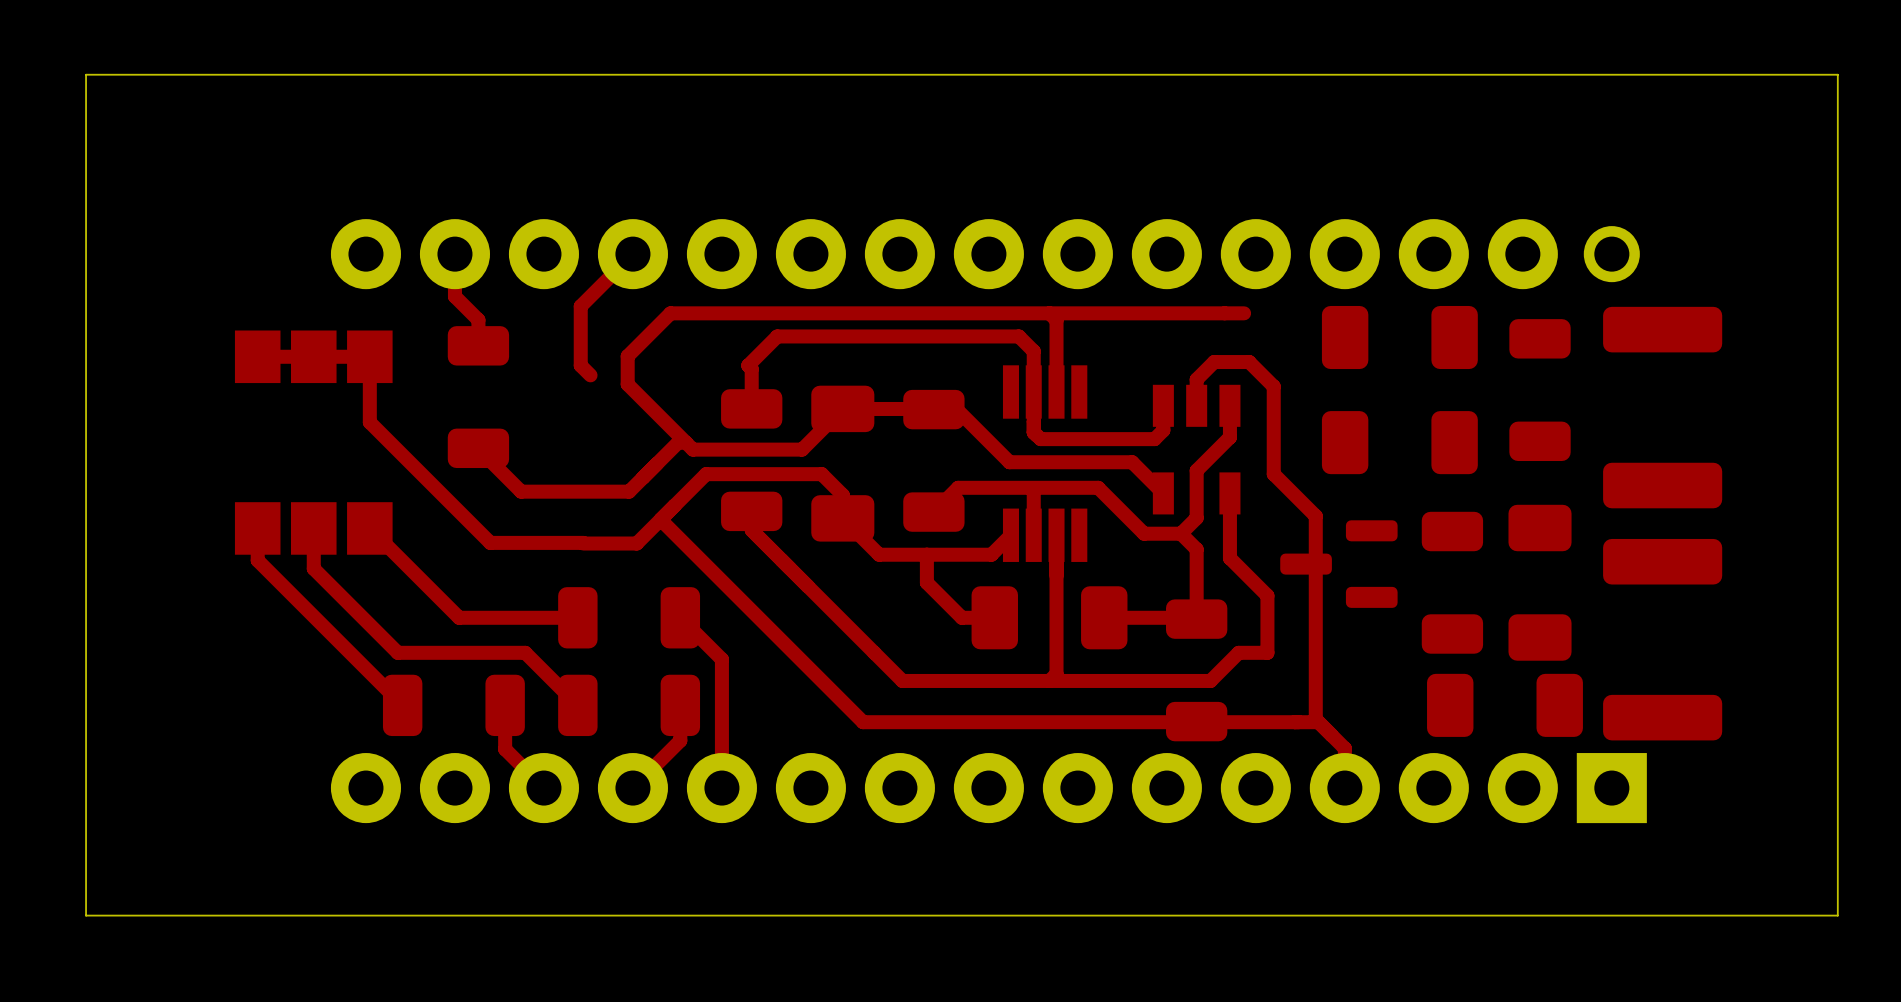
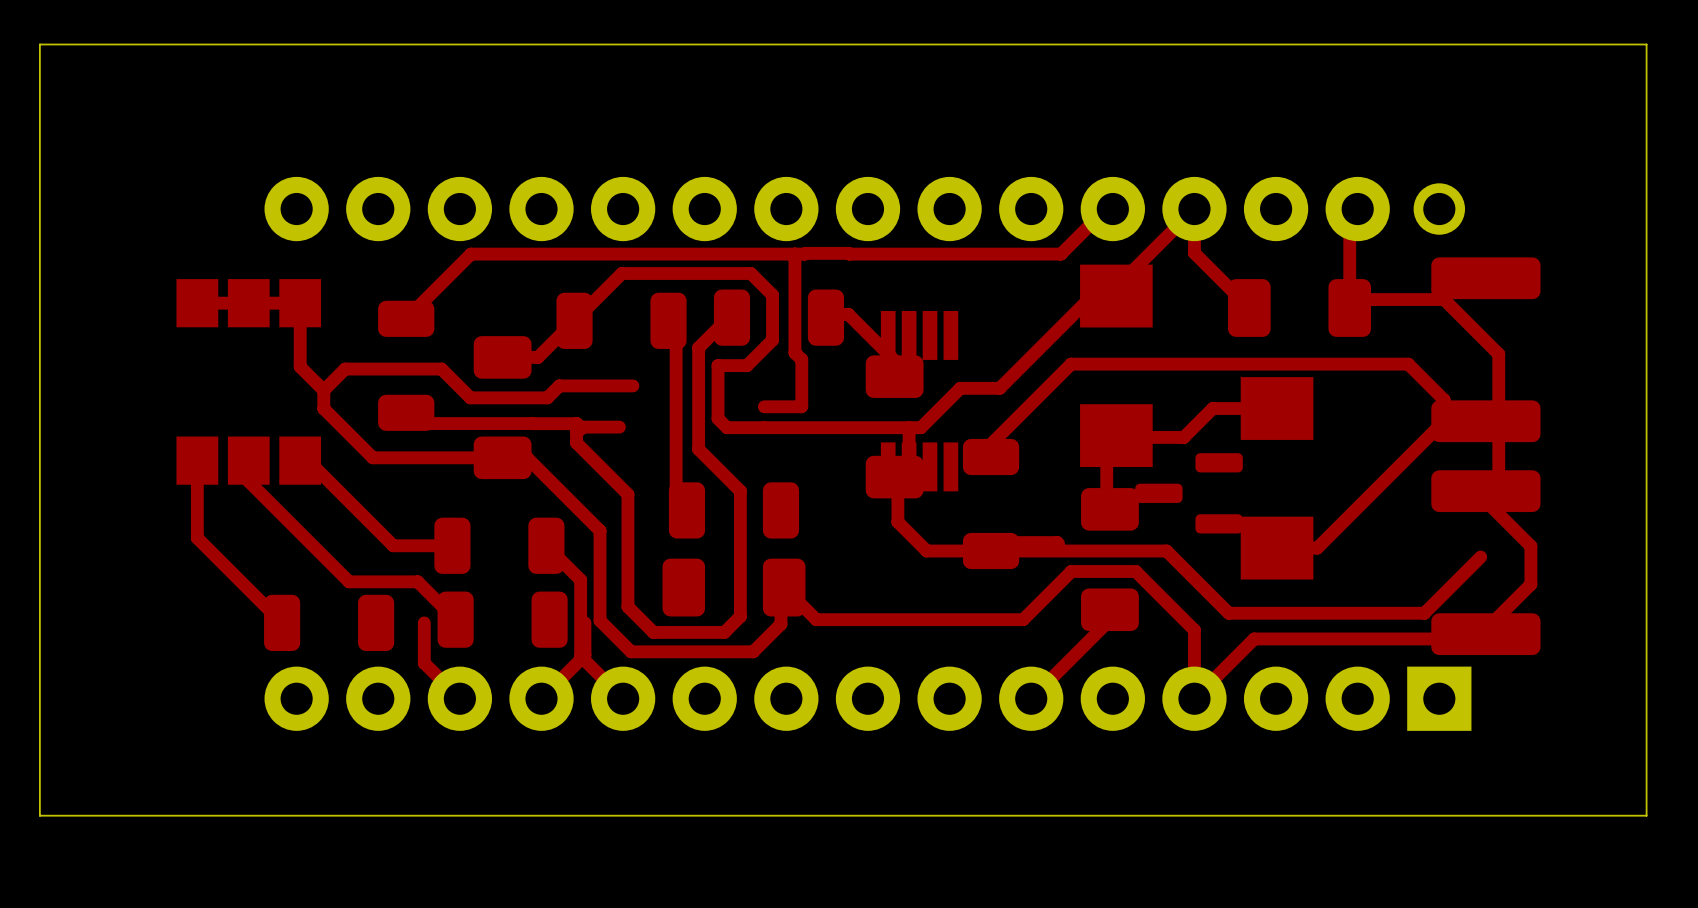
top track: (454, 254) (454, 296) (478, 319) (478, 345) -> none
top track: (632, 254) (580, 306) (580, 365) (590, 375) -> none
top track: none -> (1112, 209) (1106, 209) (1061, 254) (470, 254) (406, 318)
top track: none -> (1357, 209) (1349, 216) (1349, 307) (1358, 299) (1444, 299) (1498, 354) (1498, 477) (1480, 495) (1530, 546) (1530, 584) (1476, 638) (1254, 638) (1194, 698)
top track: none -> (794, 254) (794, 352) (801, 359) (801, 406) (764, 406)
top track: (1049, 313) (1056, 320) (1056, 392) -> none
top track: (1244, 313) (670, 313) (627, 356) (627, 384) (692, 449) (802, 449) (842, 408) -> none
part: (1399, 337) -> none
top track: none -> (1107, 296) (1194, 209) (1194, 253) (1249, 307)
top track: none -> (1116, 296) (1091, 296) (999, 388) (960, 388) (920, 427) (727, 427) (718, 418) (718, 365) (747, 365) (772, 340) (772, 295) (750, 273) (621, 273) (537, 357) (502, 357)
part: none -> (1299, 307)
top track: none -> (731, 314) (698, 347) (698, 449) (740, 491) (740, 616) (724, 632) (653, 632) (627, 606) (627, 494) (576, 442) (576, 423) (416, 423) (406, 412)
top track: none -> (825, 314) (848, 314) (894, 360)
part: none -> (778, 317)
top track: none -> (676, 318) (676, 499) (686, 510)
part: none -> (621, 320)
part: (1540, 390) -> none
part position: (478, 397) -> (406, 365)
top track: (1163, 405) (1163, 430) (1154, 439) (1040, 439) (1033, 432) -> none
top track: (1196, 405) (1196, 379) (1214, 362) (1249, 362) (1273, 386) (1273, 474) (1315, 516) (1315, 719) (1344, 748) -> (784, 587) (816, 619) (1023, 619) (1071, 571) (1135, 571) (1194, 630) (1194, 662)
top track: (1229, 405) (1229, 437) (1196, 470) (1196, 518) (1181, 533) -> none
top track: (751, 408) (751, 369) (748, 365) (777, 336) (1018, 336) (1033, 351) (1033, 432) (1036, 435) -> none
top track: (956, 408) (1009, 462) (1132, 462) (1163, 493) -> none
top track: (369, 422) (490, 542) (583, 542) -> (300, 363) (300, 366) (323, 390)
part: none -> (1116, 365)
top track: (685, 442) (678, 442) (629, 491) (521, 491) (478, 448) -> none
part: (1399, 442) -> none
top track: none -> (632, 385) (559, 385) (547, 397) (470, 397) (441, 369) (345, 369) (323, 390)
part: (1196, 449) -> none
top track: none -> (323, 390) (323, 408) (372, 457) (527, 457) (600, 530) (600, 620) (631, 651) (753, 651) (780, 624) (780, 584)
part: (751, 460) -> none
part: (933, 460) -> none
part: (842, 463) -> none
part: none -> (502, 407)
top track: none -> (1277, 408) (1212, 408) (1183, 437) (1108, 437) (1106, 435) (1106, 506) (1109, 509)
top track: none -> (619, 427) (582, 427) (576, 433)
part: none -> (894, 426)
top track: (1229, 493) (1229, 558) (1267, 595) (1267, 652) (1238, 652) (1210, 680) (902, 680) (751, 530) (751, 511) -> none
top track: (933, 512) (958, 487) (1098, 487) (1144, 533) (1181, 533) -> none
top track: (660, 519) (863, 722) (1318, 722) -> none
top track: none -> (978, 457) (1071, 364) (1408, 364) (1444, 399) (1444, 421) (1317, 548) (1277, 548)
top track: (369, 528) (459, 617) (577, 617) -> (300, 460) (308, 460) (393, 545) (452, 545)
top track: (1181, 533) (1196, 549) (1196, 618) -> none
top track: (1010, 535) (991, 554) (879, 554) (842, 518) (842, 495) (821, 474) (706, 474) (636, 543) (583, 543) -> none
top track: (1056, 535) (1056, 673) (1049, 680) -> none
top track: none -> (897, 477) (897, 522) (926, 551) (1166, 551) (1228, 613) (1424, 613) (1480, 557)
part: none -> (1277, 478)
top track: (313, 551) (313, 568) (397, 652) (525, 652) (577, 705) -> (248, 481) (349, 581) (417, 581) (455, 619)
top track: (926, 554) (926, 582) (961, 617) (994, 617) -> none
top track: (257, 560) (402, 705) -> (197, 489) (197, 538) (282, 622)
part: none -> (991, 504)
part: none -> (733, 510)
part: (1452, 582) -> none
part: (1540, 582) -> none
part position: (629, 617) -> (499, 545)
top track: (680, 617) (721, 659) (721, 788) -> (546, 545) (580, 580) (580, 656) (623, 698)
part: (1049, 617) -> none
part: none -> (1109, 559)
part: none -> (733, 587)
part: (1196, 670) -> none
top track: none -> (1109, 609) (1109, 620) (1031, 698)
part position: (453, 705) -> (329, 622)
part position: (629, 705) -> (502, 619)
part: (1504, 705) -> none

